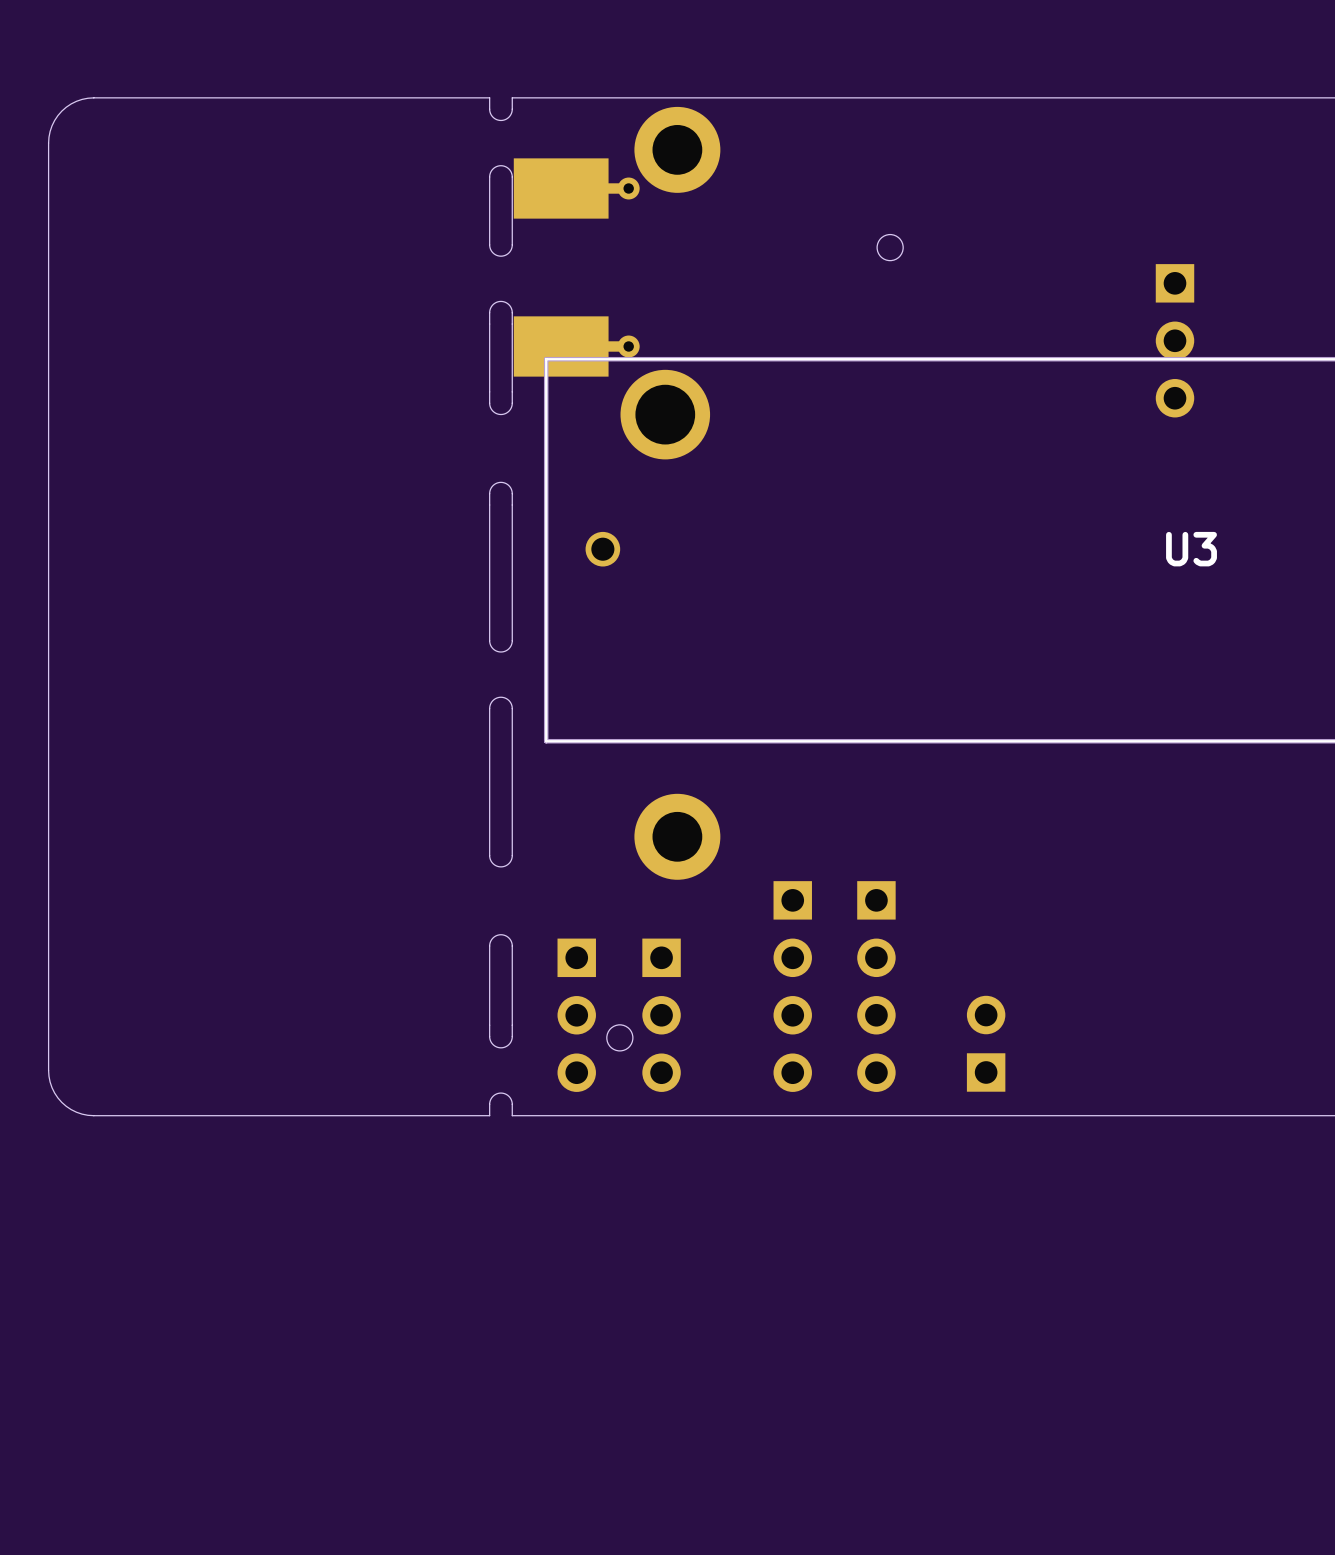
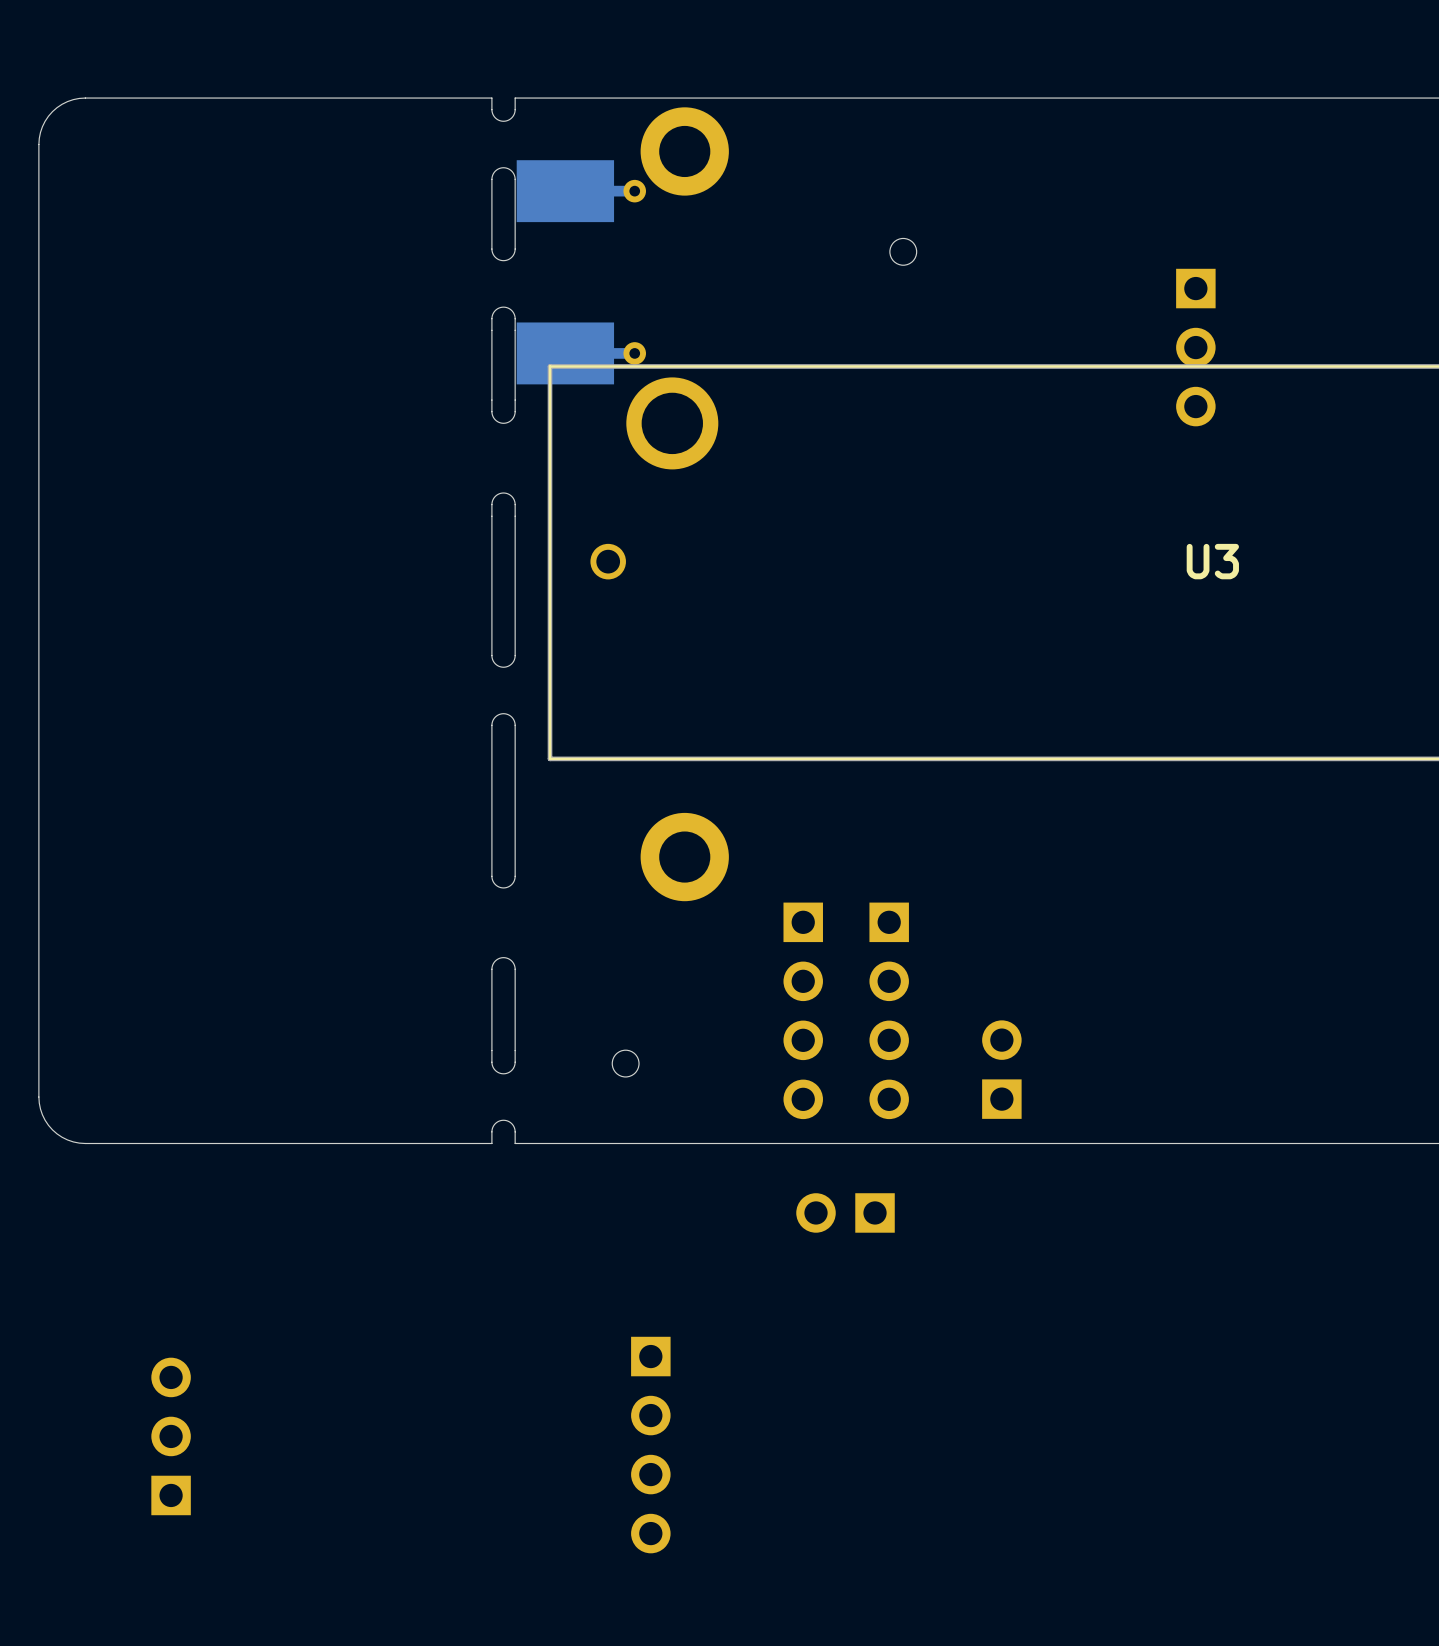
part: (576, 1015) -> none
part: (661, 1015) -> none
part: none -> (845, 1212)
part: none -> (171, 1436)
part: none -> (650, 1445)

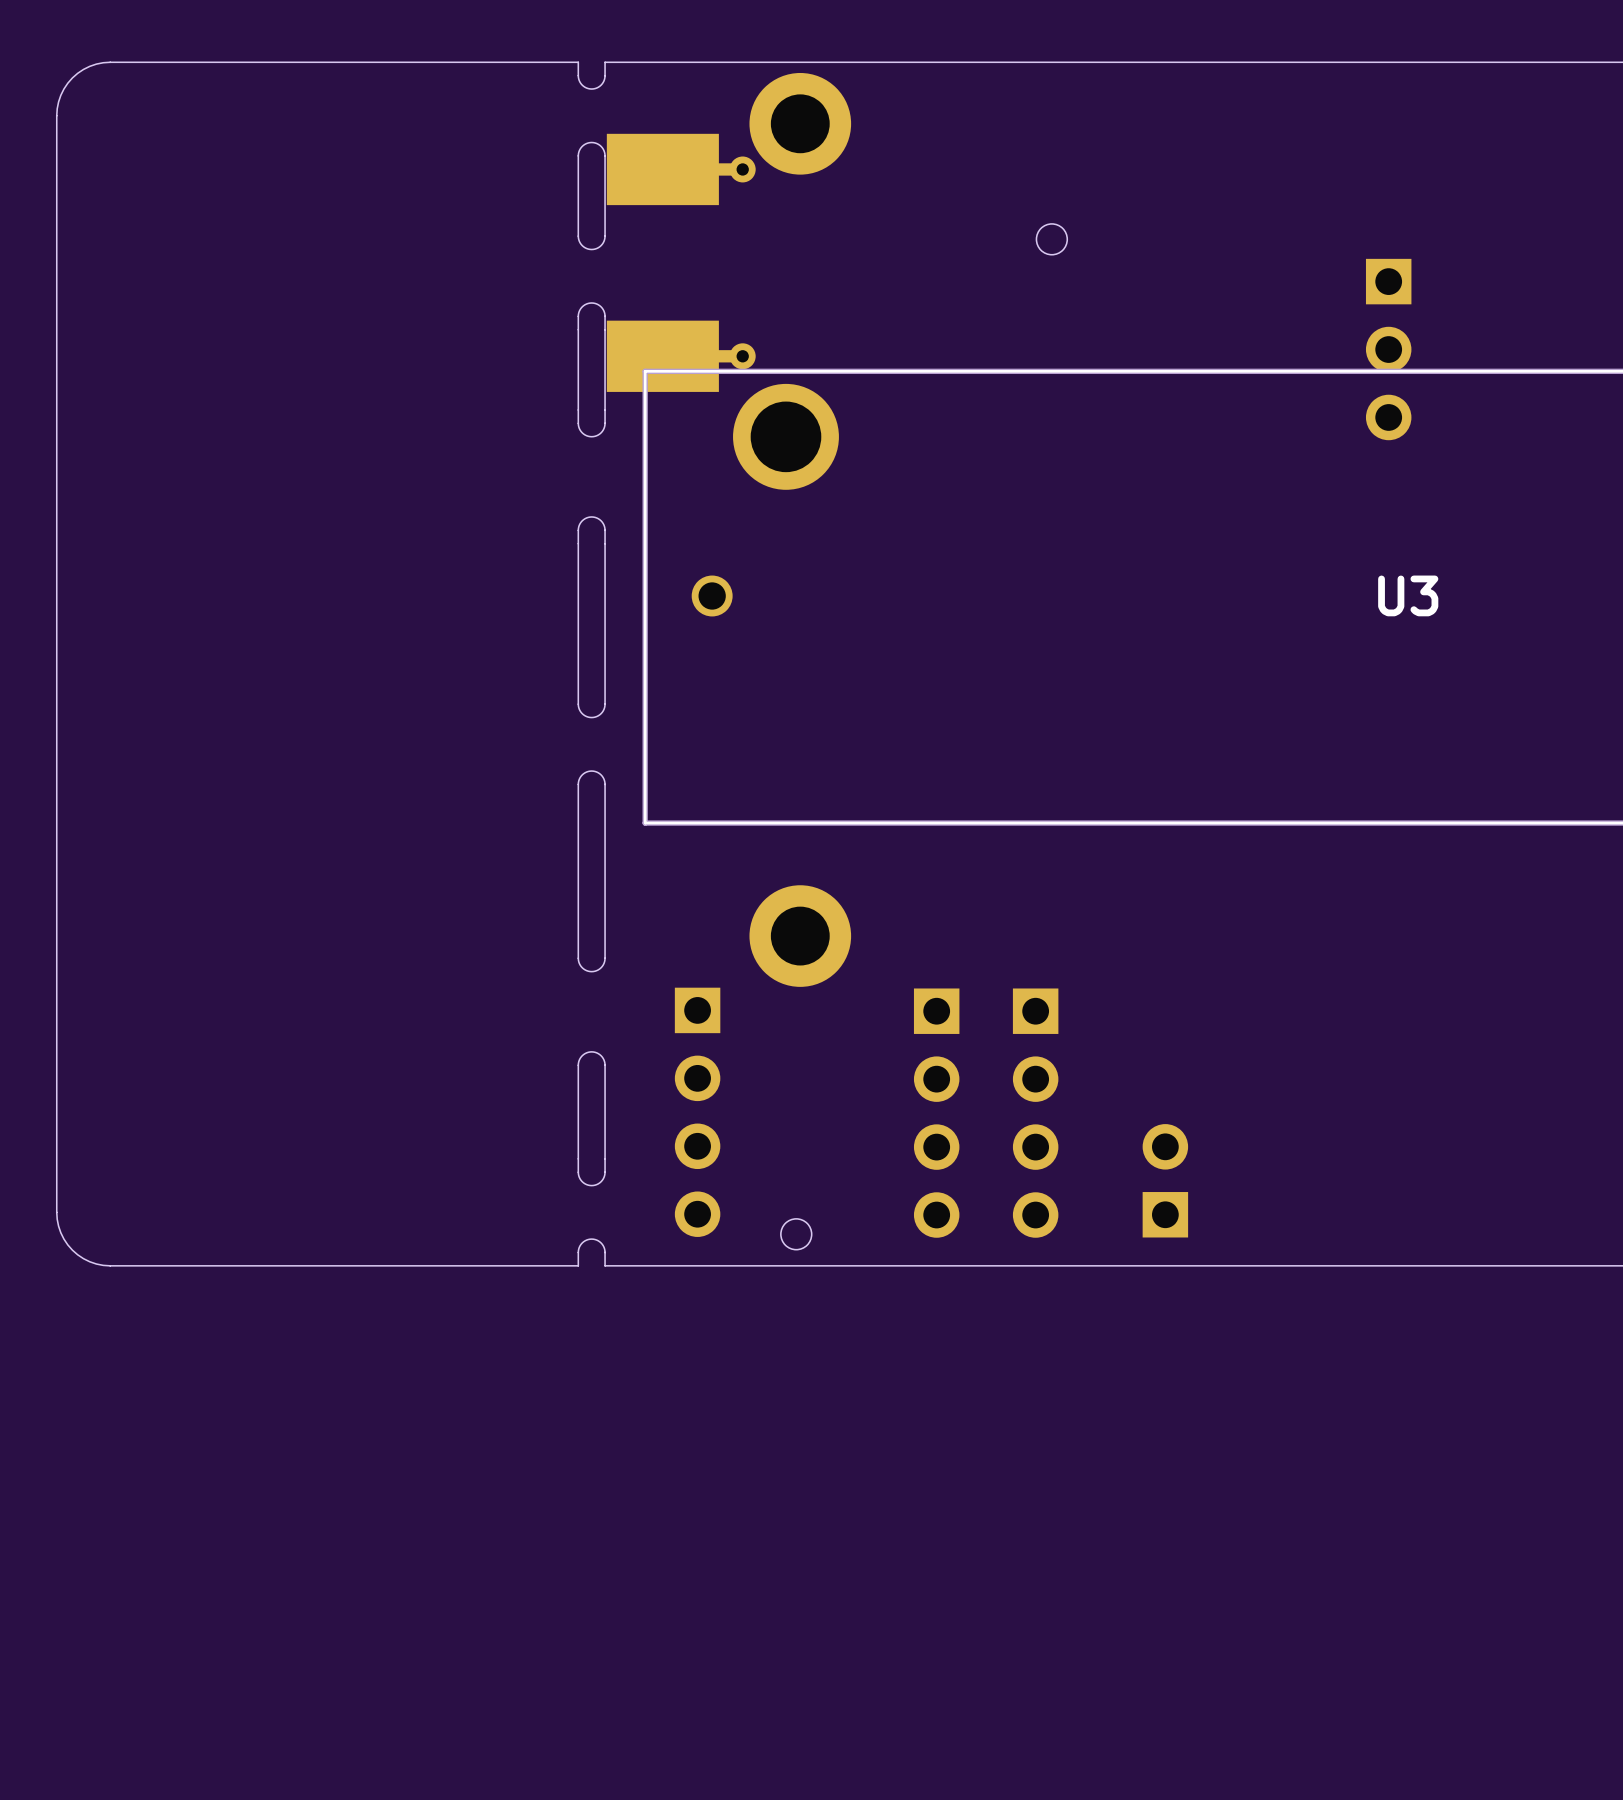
round board edge position: (625, 1063) -> (796, 1234)
part: (845, 1212) -> none
part: (171, 1436) -> none
part position: (650, 1445) -> (697, 1112)

